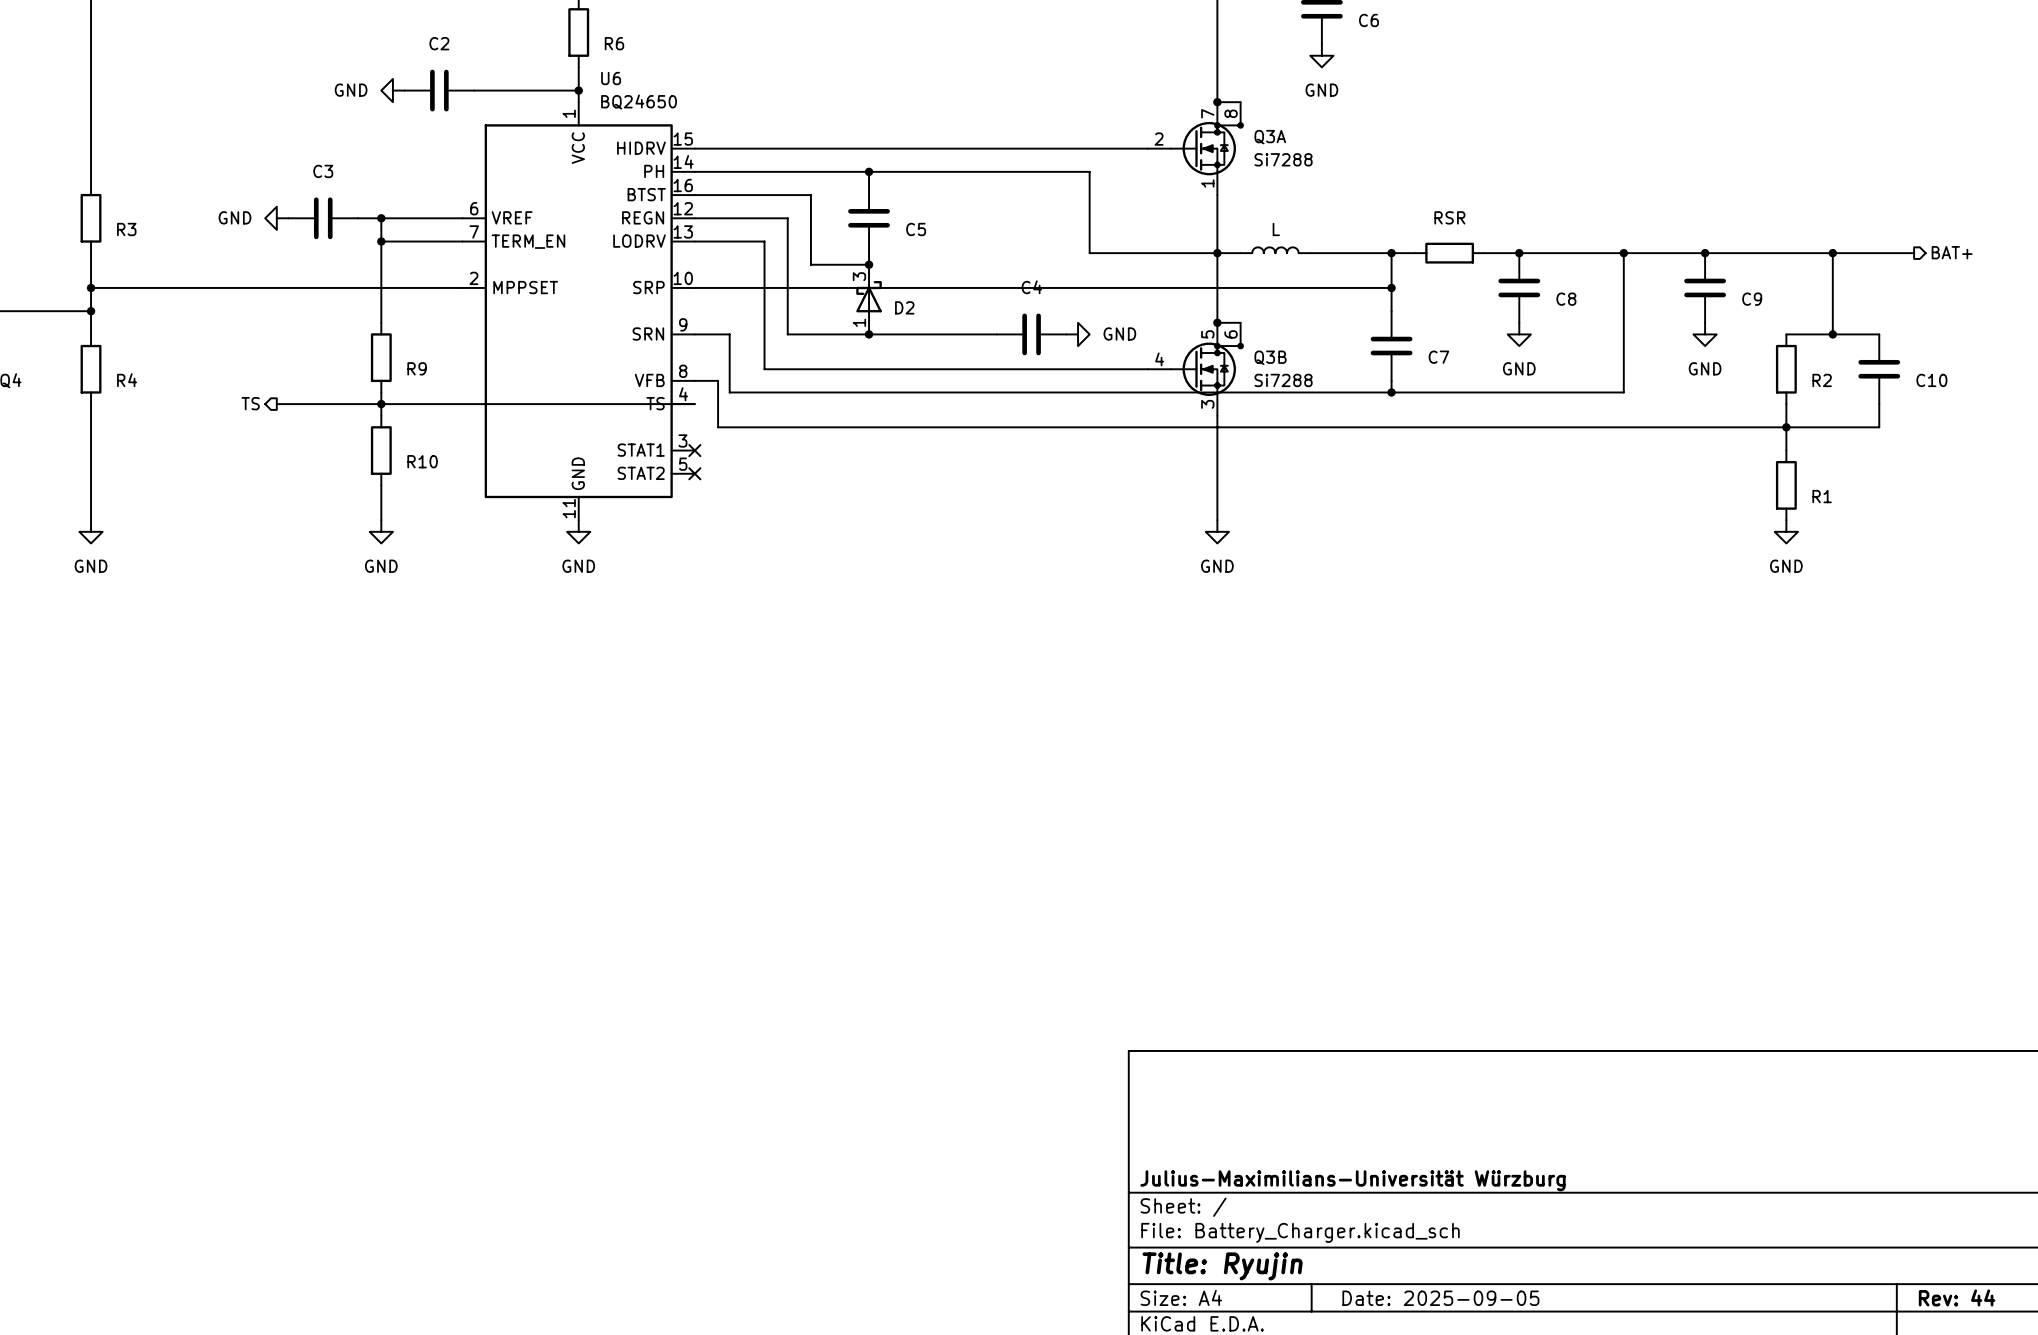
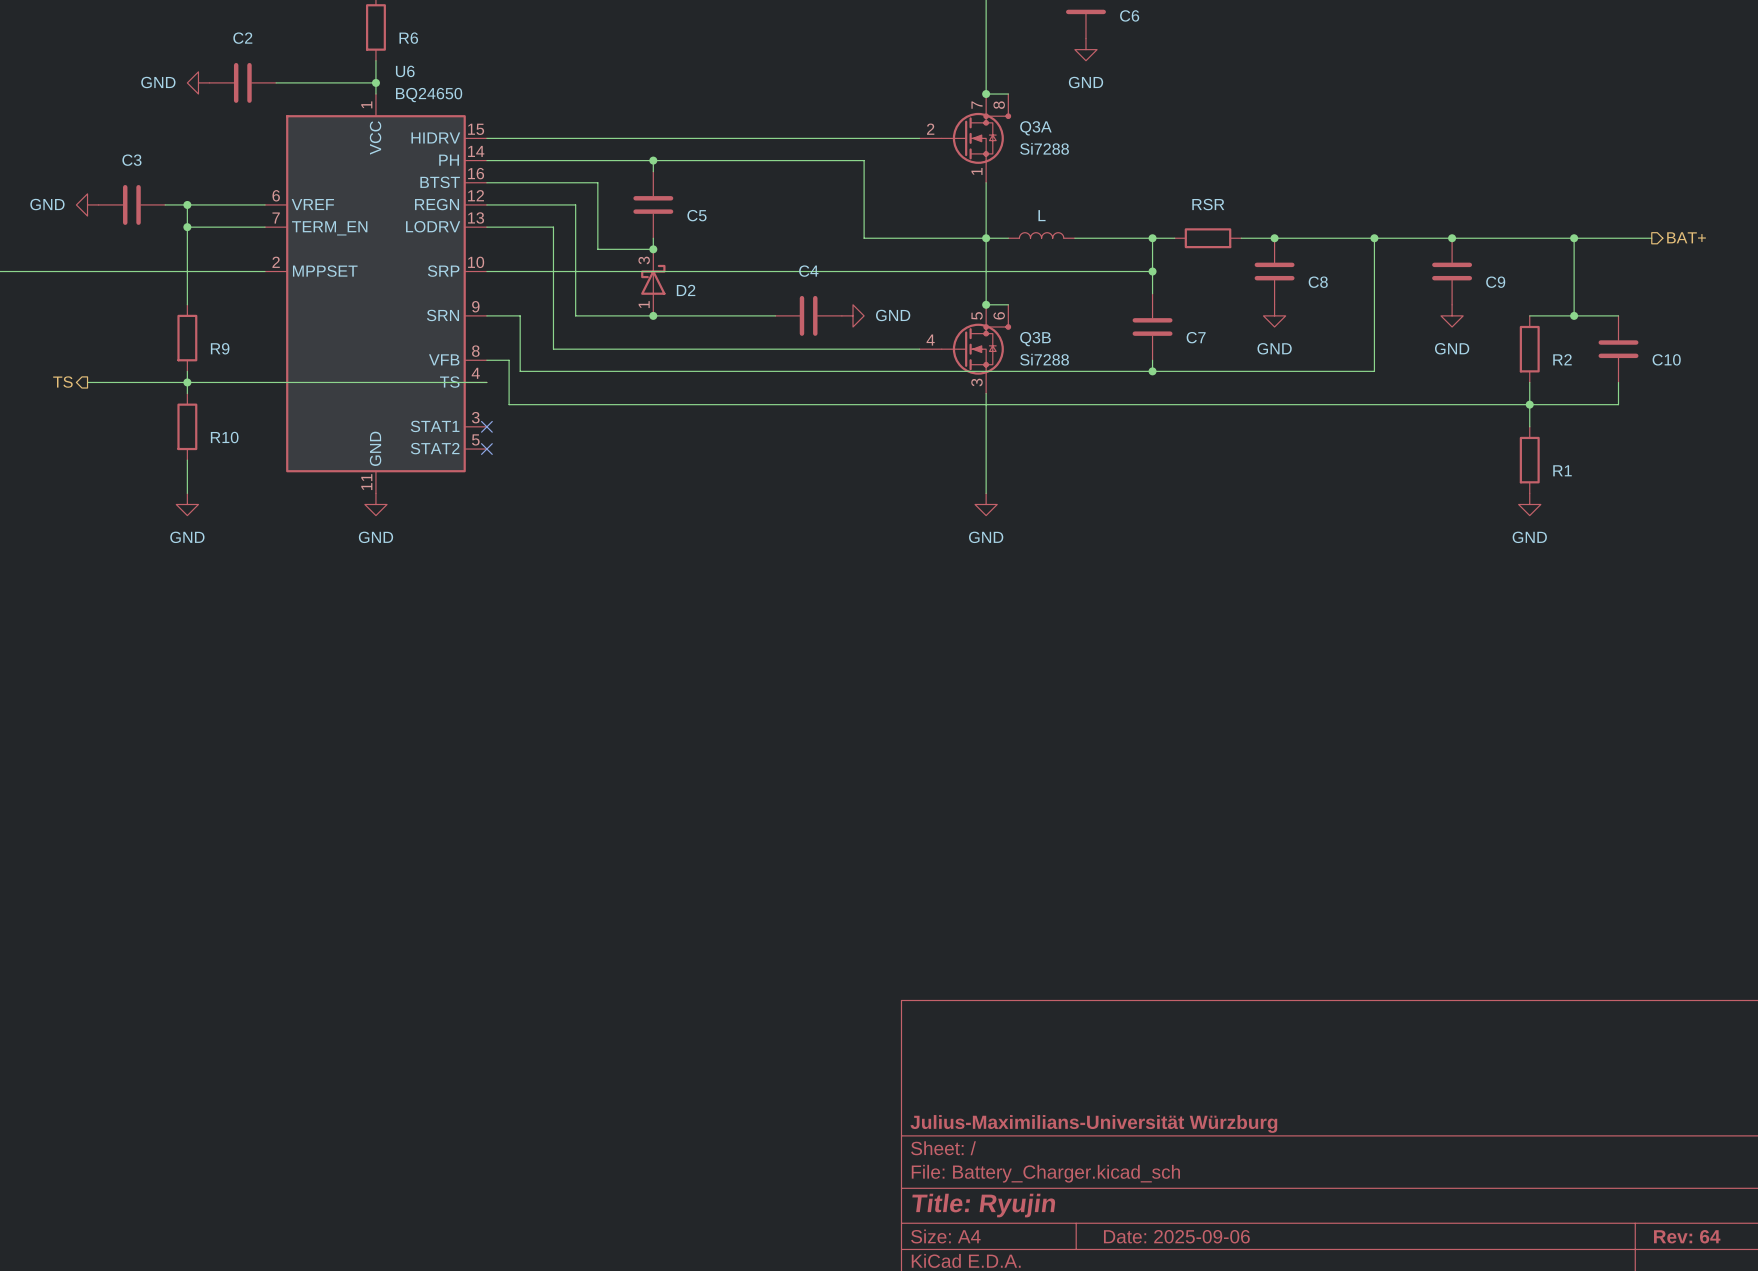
title block: Rev: 44 (1957, 1297) -> Rev: 64 (1687, 1236)
title block: Date: 2025-09-05 (1440, 1298) -> Date: 2025-09-06 (1176, 1236)

